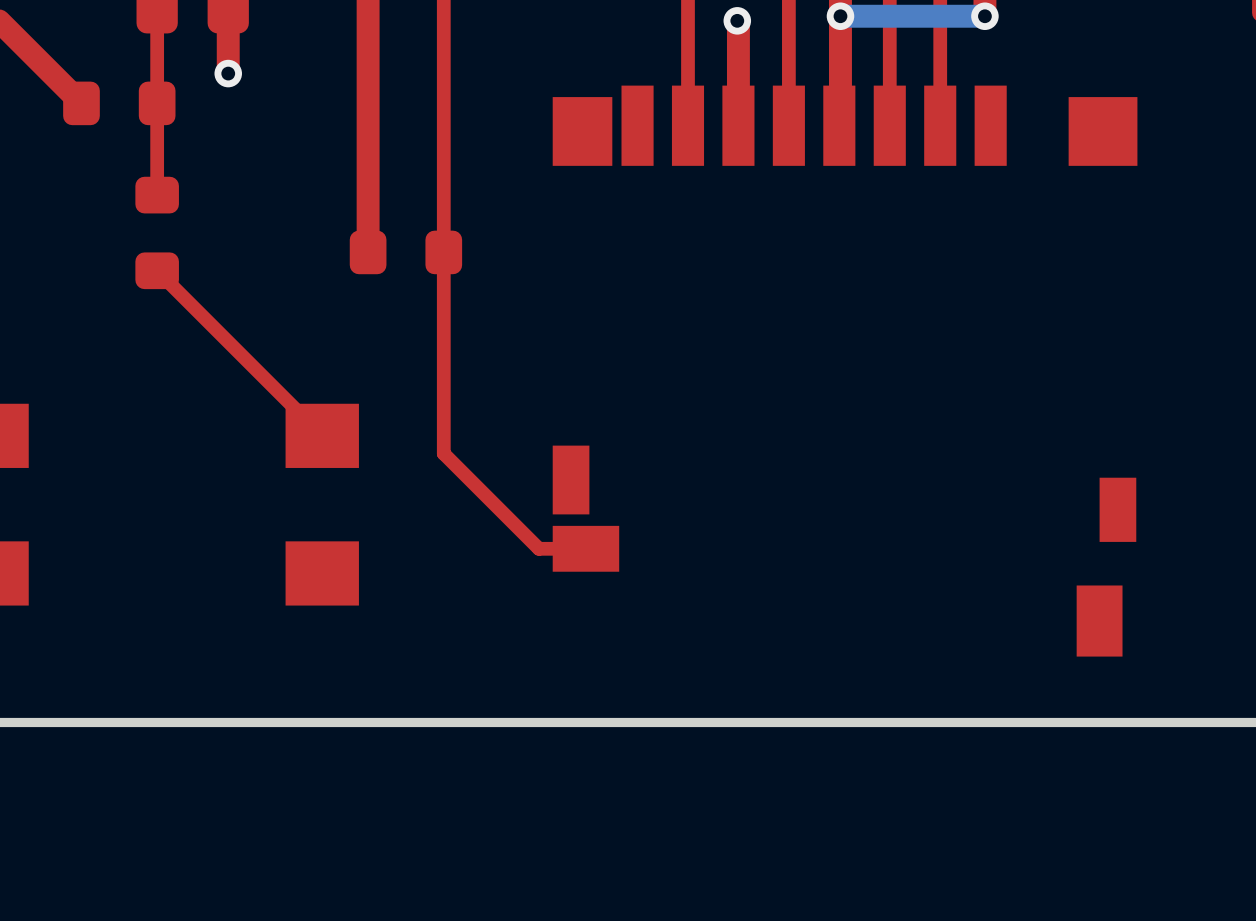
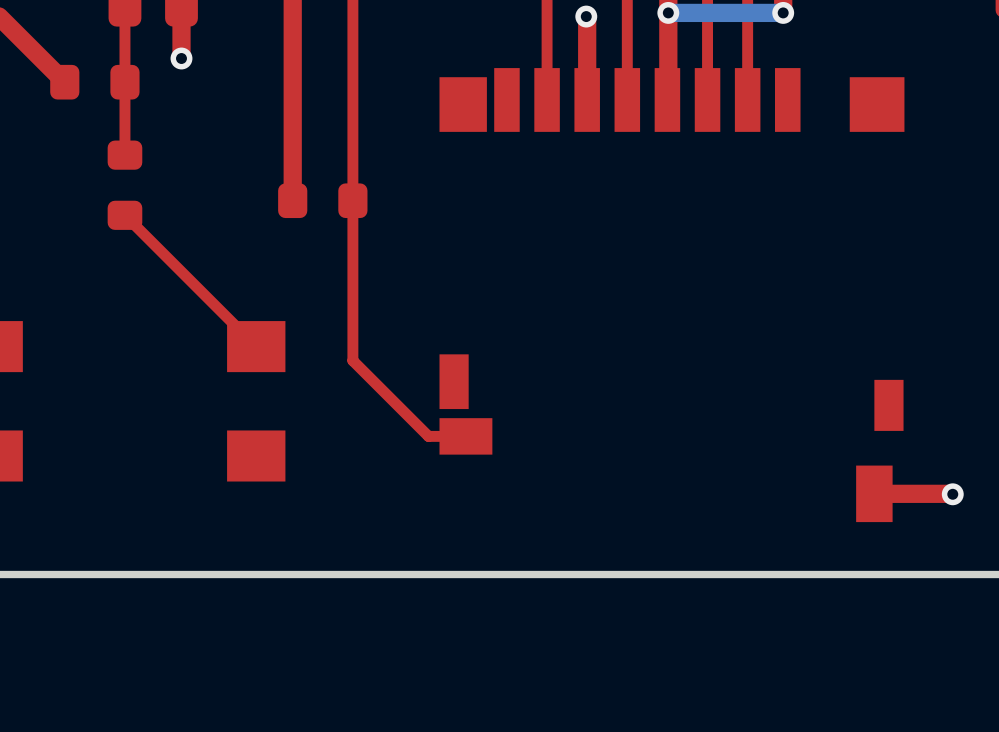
top track: none -> (952, 493) (874, 493)
via: none -> (952, 494)

